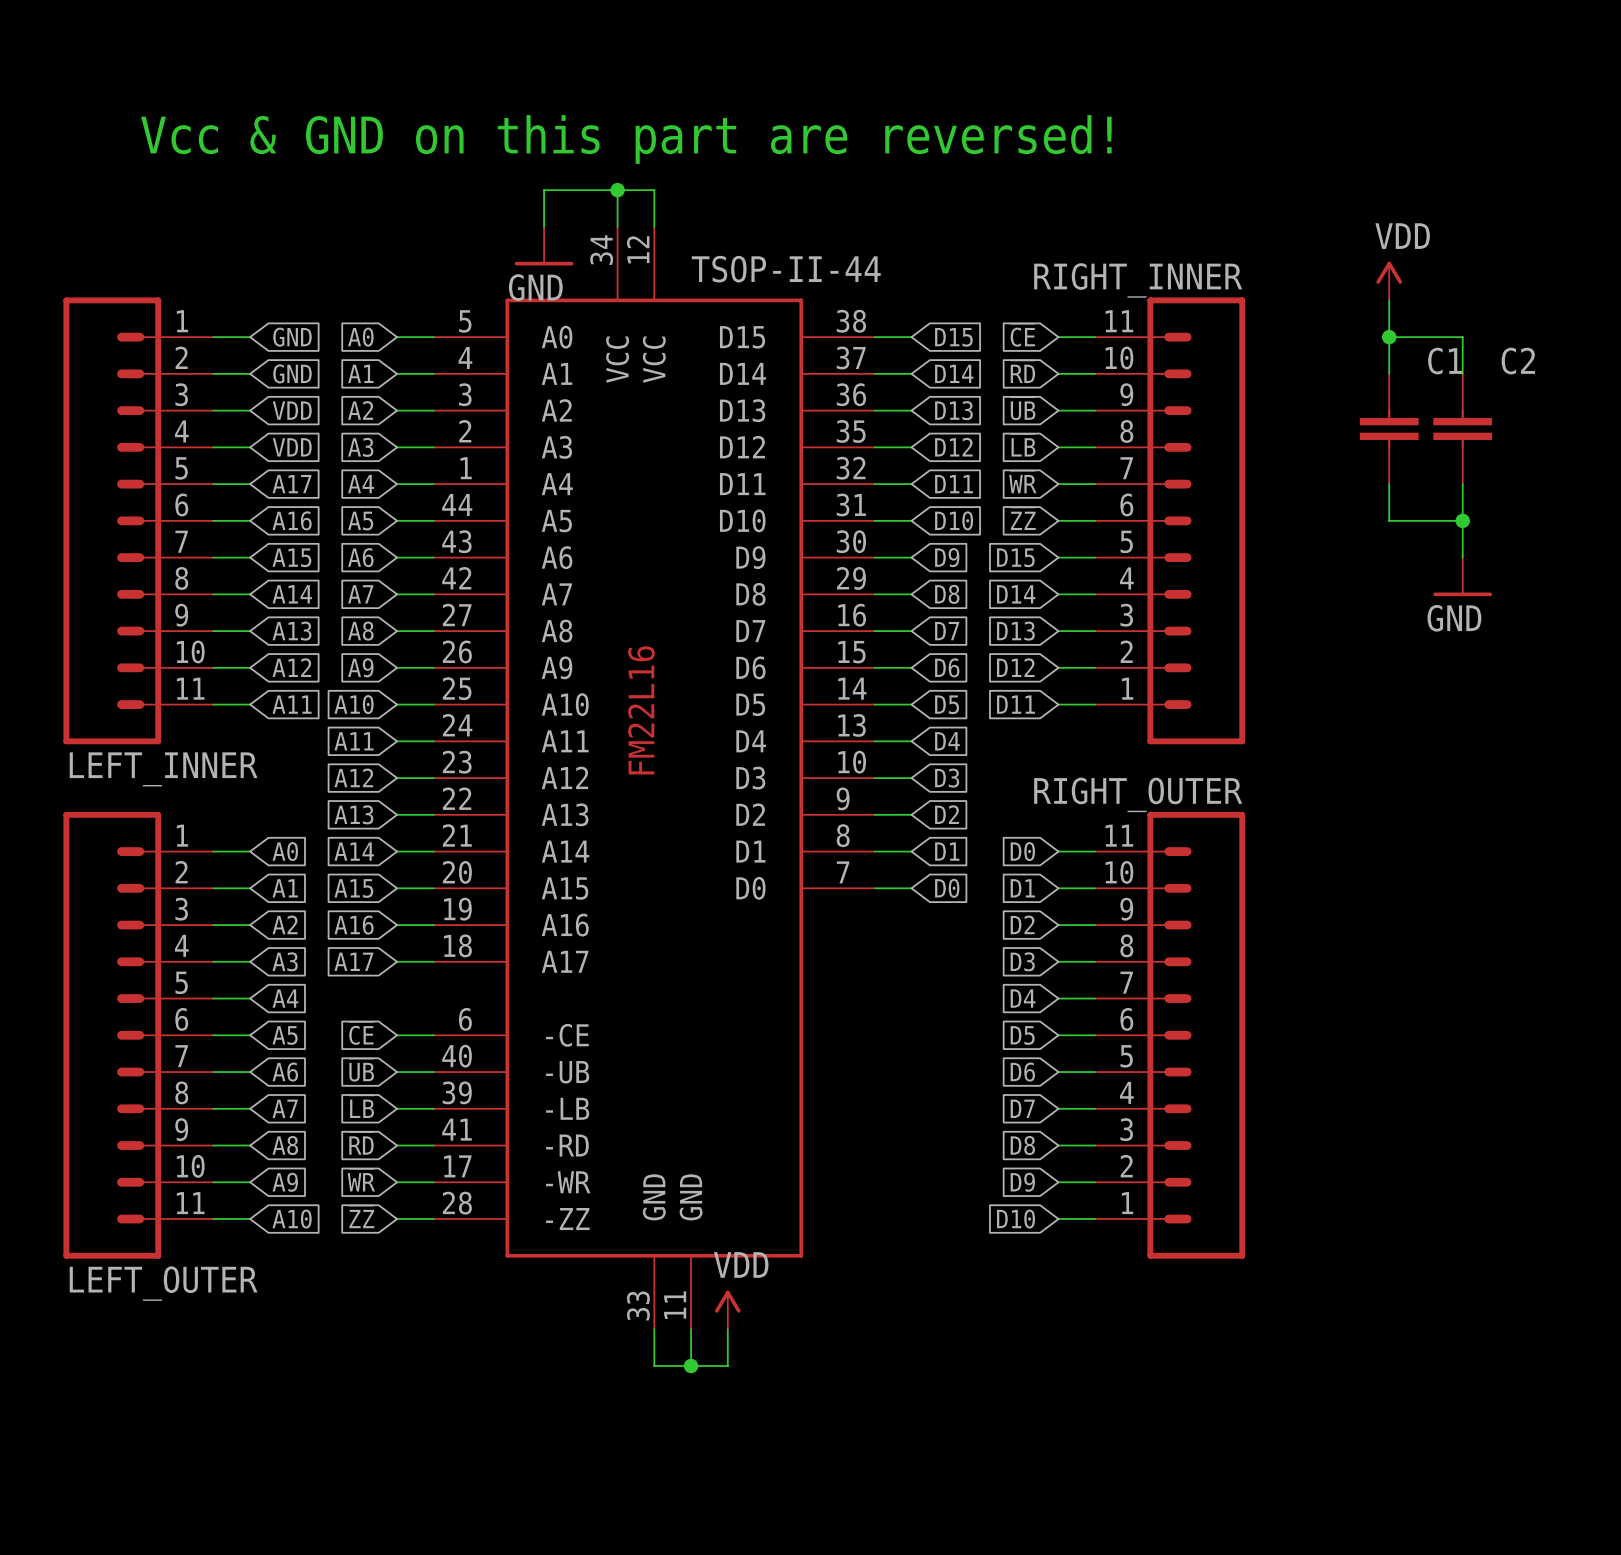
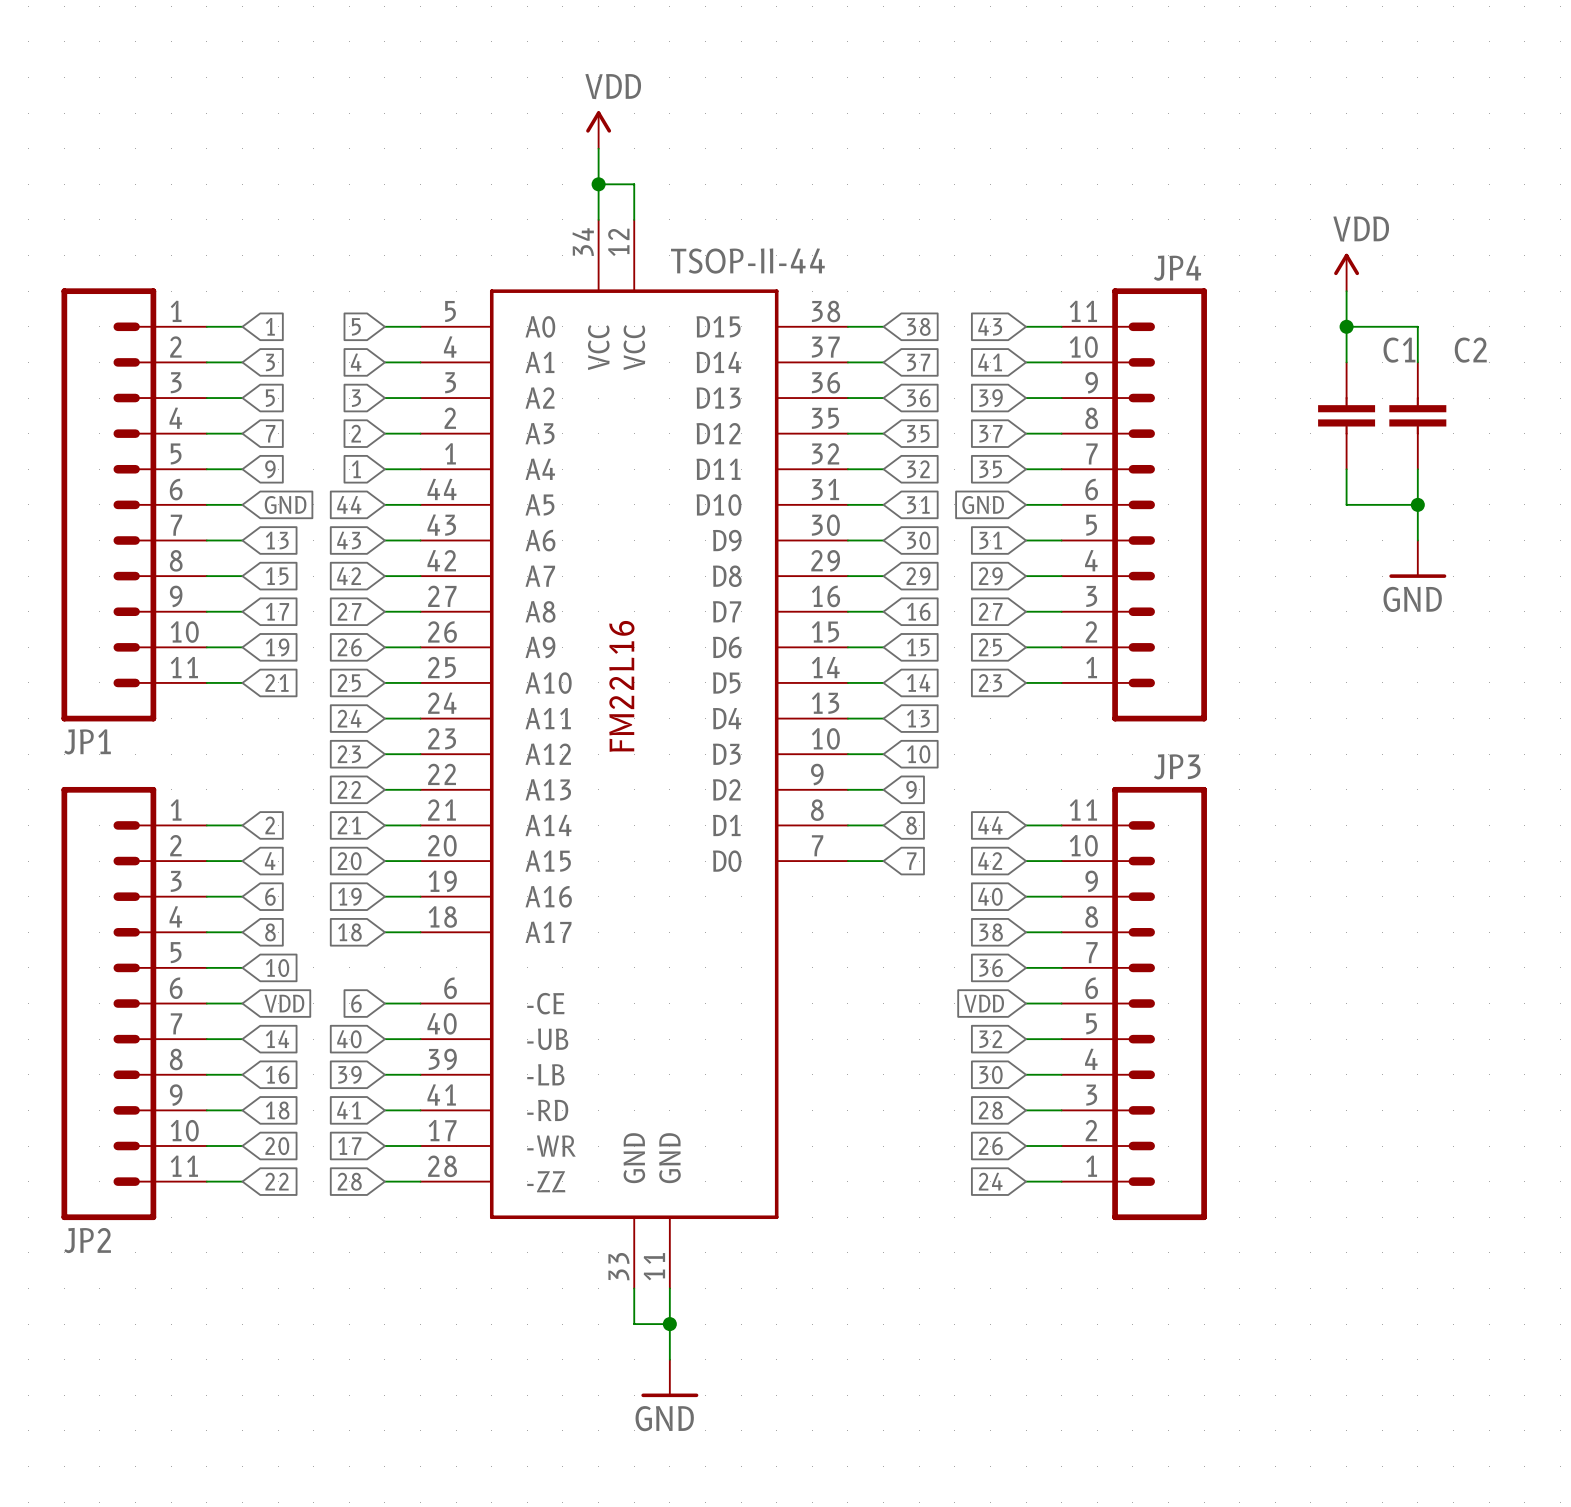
power symbol: none -> VDD (598, 130)
text: Vcc & GND on this part are reversed! (626, 139) -> none
wire: (617, 190) (544, 190) (544, 226) -> (598, 184) (598, 148)
power symbol: GND (544, 246) -> none
RIGHT_INNER name: RIGHT_INNER (1138, 280) -> JP4 (1177, 268)
global label: ~{CE} (1022, 335) -> 43 (990, 326)
global label: GND (292, 337) -> 1 (270, 326)
global label: A0 (360, 337) -> 5 (356, 326)
global label: D15 (953, 337) -> 38 (918, 326)
global label: ~{RD} (1022, 371) -> 41 (990, 362)
global label: GND (292, 373) -> 3 (270, 362)
global label: A1 (360, 373) -> 4 (356, 362)
global label: D14 (954, 373) -> 37 (918, 362)
global label: ~{UB} (1023, 408) -> 39 (991, 398)
global label: VDD (292, 410) -> 5 (270, 398)
global label: A2 (360, 410) -> 3 (356, 398)
global label: D13 (953, 410) -> 36 (918, 398)
global label: ~{LB} (1023, 445) -> 37 (990, 433)
global label: VDD (292, 447) -> 7 (270, 433)
global label: A3 (360, 447) -> 2 (356, 433)
global label: D12 (953, 447) -> 35 (918, 433)
global label: ~{WR} (1022, 482) -> 35 (990, 469)
global label: A17 (291, 484) -> 9 (270, 469)
global label: A4 (361, 484) -> 1 (356, 469)
global label: D11 (954, 484) -> 32 (918, 469)
global label: ~{ZZ} (1023, 518) -> GND (983, 504)
global label: A16 (292, 520) -> GND (285, 504)
global label: D10 (954, 520) -> 31 (918, 504)
global label: A5 (360, 521) -> 44 (349, 504)
global label: A15 (291, 557) -> 13 (277, 540)
global label: A6 (360, 557) -> 43 (349, 540)
global label: D9 (947, 557) -> 30 (918, 540)
global label: D15 (1015, 557) -> 31 (990, 540)
global label: A14 (292, 594) -> 15 (277, 576)
global label: A7 (360, 594) -> 42 (349, 576)
global label: D8 (947, 594) -> 29 (918, 576)
global label: D14 (1016, 594) -> 29 (990, 576)
global label: A13 (291, 631) -> 17 (277, 611)
global label: A8 (360, 631) -> 27 (349, 611)
global label: D7 (947, 631) -> 16 (918, 611)
global label: D13 (1015, 631) -> 27 (990, 611)
global label: A12 (291, 667) -> 19 (277, 647)
global label: A9 (360, 667) -> 26 (349, 647)
global label: D6 (947, 667) -> 15 (918, 647)
global label: D12 (1015, 667) -> 25 (990, 647)
global label: A11 (292, 704) -> 21 (276, 682)
global label: A10 (354, 704) -> 25 (349, 682)
global label: D5 (947, 704) -> 14 (918, 682)
global label: D11 (1015, 704) -> 23 (990, 682)
global label: A11 (353, 741) -> 24 (349, 718)
global label: D4 (947, 741) -> 13 (918, 718)
LEFT_INNER name: LEFT_INNER (163, 769) -> JP1 (87, 741)
global label: A12 (353, 777) -> 23 (349, 754)
global label: D3 (947, 778) -> 10 (918, 754)
RIGHT_OUTER name: RIGHT_OUTER (1138, 794) -> JP3 (1177, 766)
global label: A13 (353, 814) -> 22 (349, 789)
global label: D2 (947, 814) -> 9 (911, 789)
global label: A0 (285, 851) -> 2 (270, 825)
global label: A14 (354, 851) -> 21 (349, 825)
global label: D1 (947, 851) -> 8 (911, 825)
global label: D0 (1022, 851) -> 44 (990, 825)
global label: A1 (285, 888) -> 4 (270, 861)
global label: A15 (353, 888) -> 20 (349, 861)
global label: D0 (947, 888) -> 7 (911, 861)
global label: D1 (1022, 888) -> 42 (990, 861)
global label: A2 (285, 924) -> 6 (270, 896)
global label: D2 (1022, 924) -> 40 (990, 896)
global label: A16 (354, 925) -> 19 (349, 896)
global label: A3 (285, 961) -> 8 (270, 932)
global label: A17 (353, 961) -> 18 (349, 932)
global label: D3 (1022, 961) -> 38 (991, 932)
global label: A4 (285, 998) -> 10 (277, 968)
global label: D4 (1023, 998) -> 36 (991, 968)
global label: ~{CE} (361, 1033) -> 6 (356, 1003)
global label: A5 (285, 1035) -> VDD (284, 1003)
global label: D5 (1022, 1035) -> VDD (984, 1003)
global label: ~{UB} (361, 1070) -> 40 (349, 1039)
global label: A6 (285, 1072) -> 14 (277, 1039)
global label: D6 (1022, 1072) -> 32 (990, 1039)
global label: ~{LB} (361, 1106) -> 39 (349, 1074)
global label: A7 (285, 1108) -> 16 (277, 1074)
global label: D7 (1022, 1108) -> 30 (991, 1074)
global label: ~{RD} (361, 1143) -> 41 (349, 1110)
global label: A8 (285, 1145) -> 18 (277, 1110)
global label: D8 (1022, 1145) -> 28 (990, 1110)
global label: ~{WR} (361, 1180) -> 17 (349, 1146)
global label: A9 (285, 1182) -> 20 (277, 1146)
global label: D9 (1022, 1182) -> 26 (990, 1146)
global label: ~{ZZ} (361, 1216) -> 28 (349, 1181)
global label: A10 (292, 1219) -> 22 (277, 1181)
global label: D10 (1016, 1219) -> 24 (990, 1181)
LEFT_OUTER name: LEFT_OUTER (163, 1283) -> JP2 (87, 1240)
power symbol: VDD (727, 1309) -> none
wire: (727, 1329) (727, 1366) (691, 1366) -> (669, 1359) (669, 1324)
power symbol: none -> GND (669, 1378)

